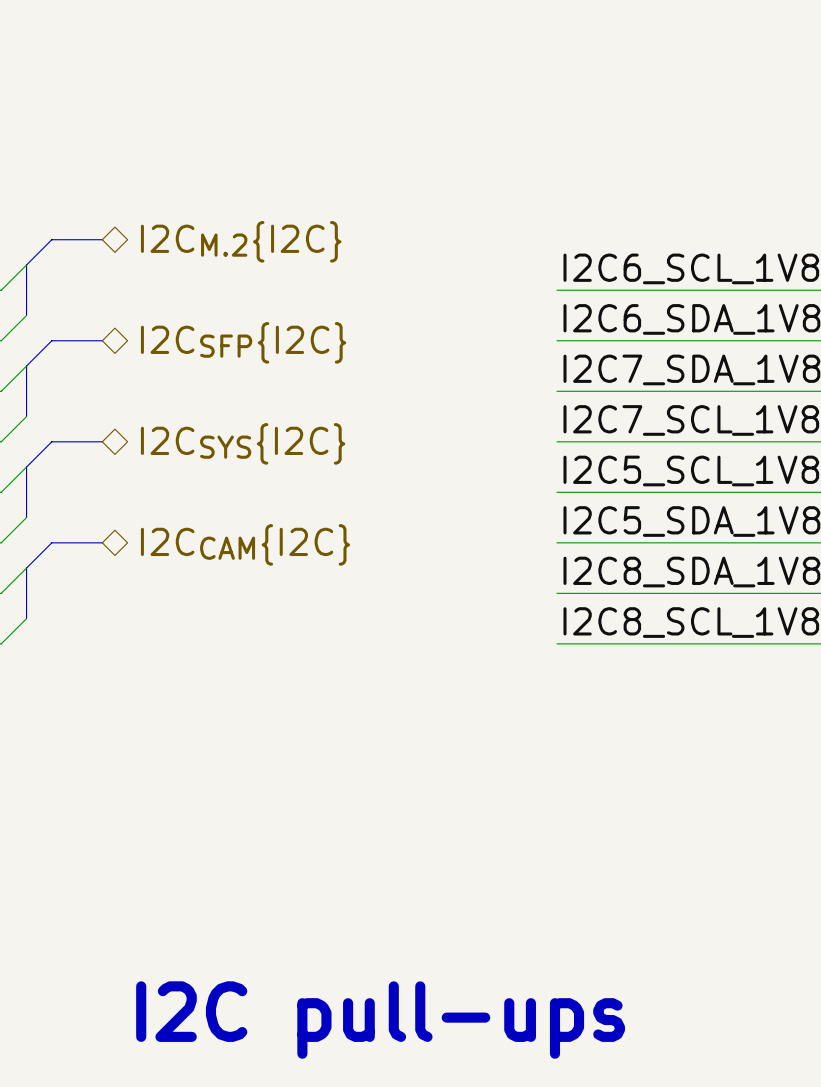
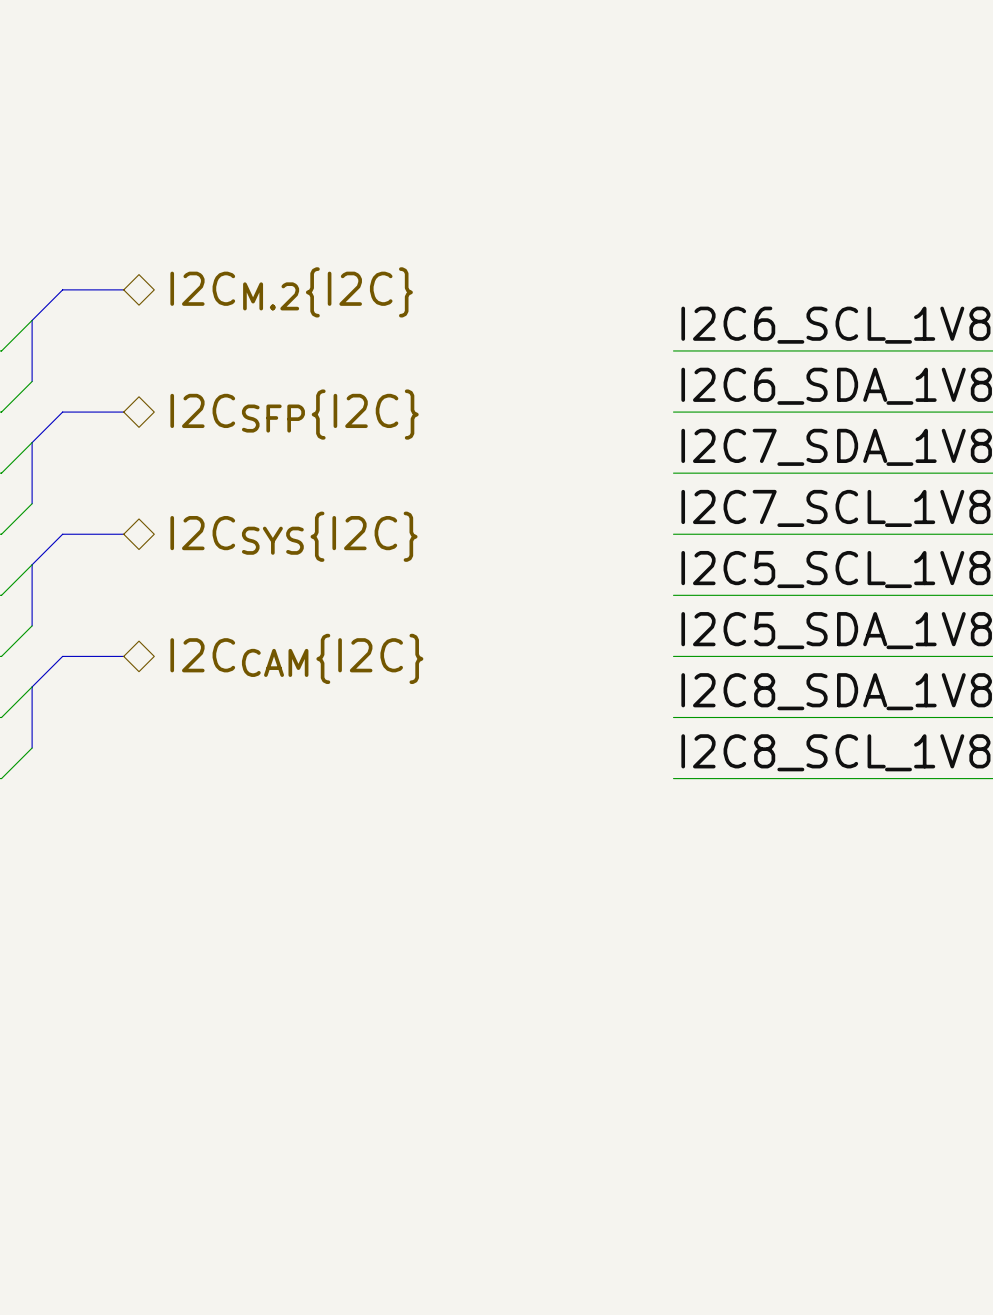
text: I2C pull-ups (380, 1020) -> none

